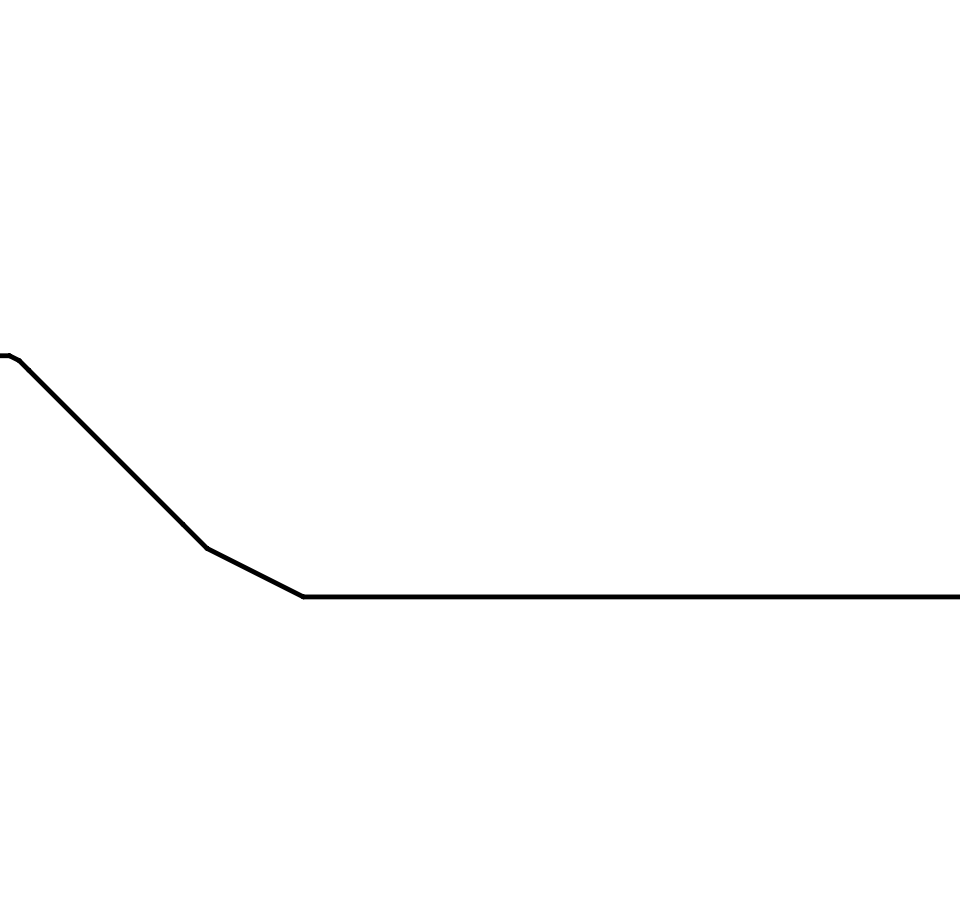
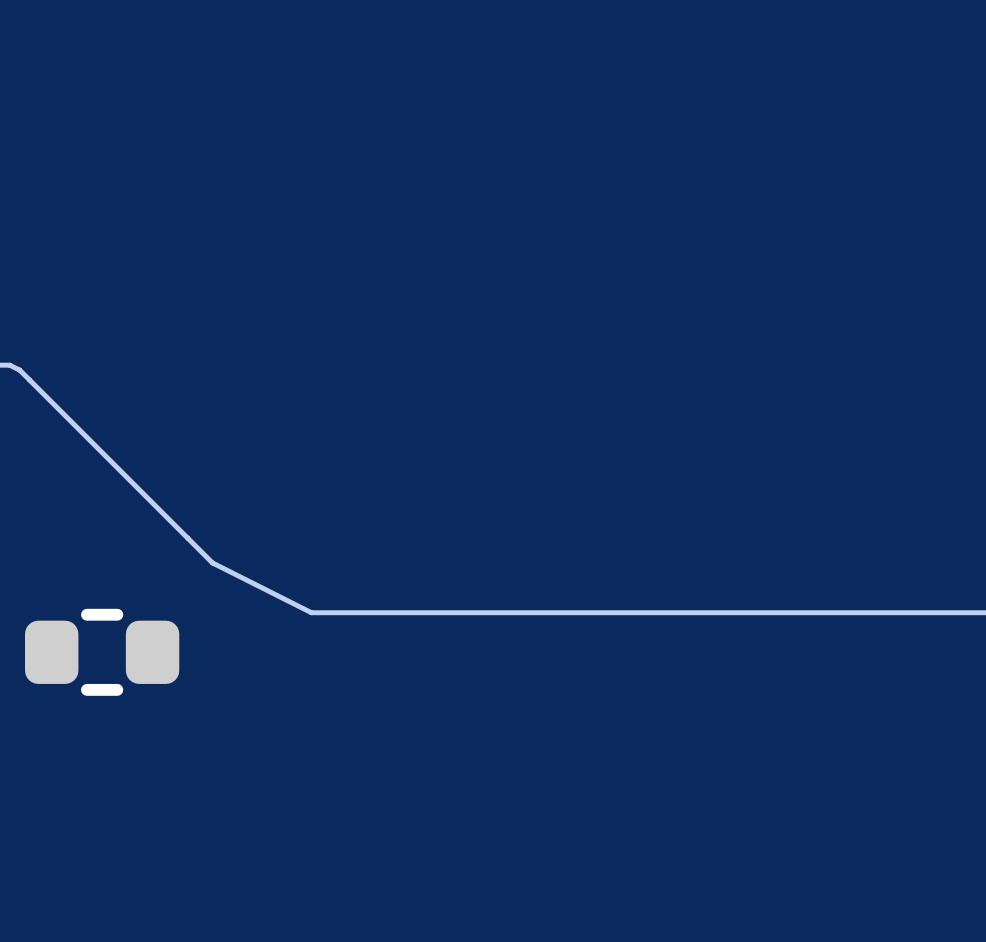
part: none -> (102, 652)

